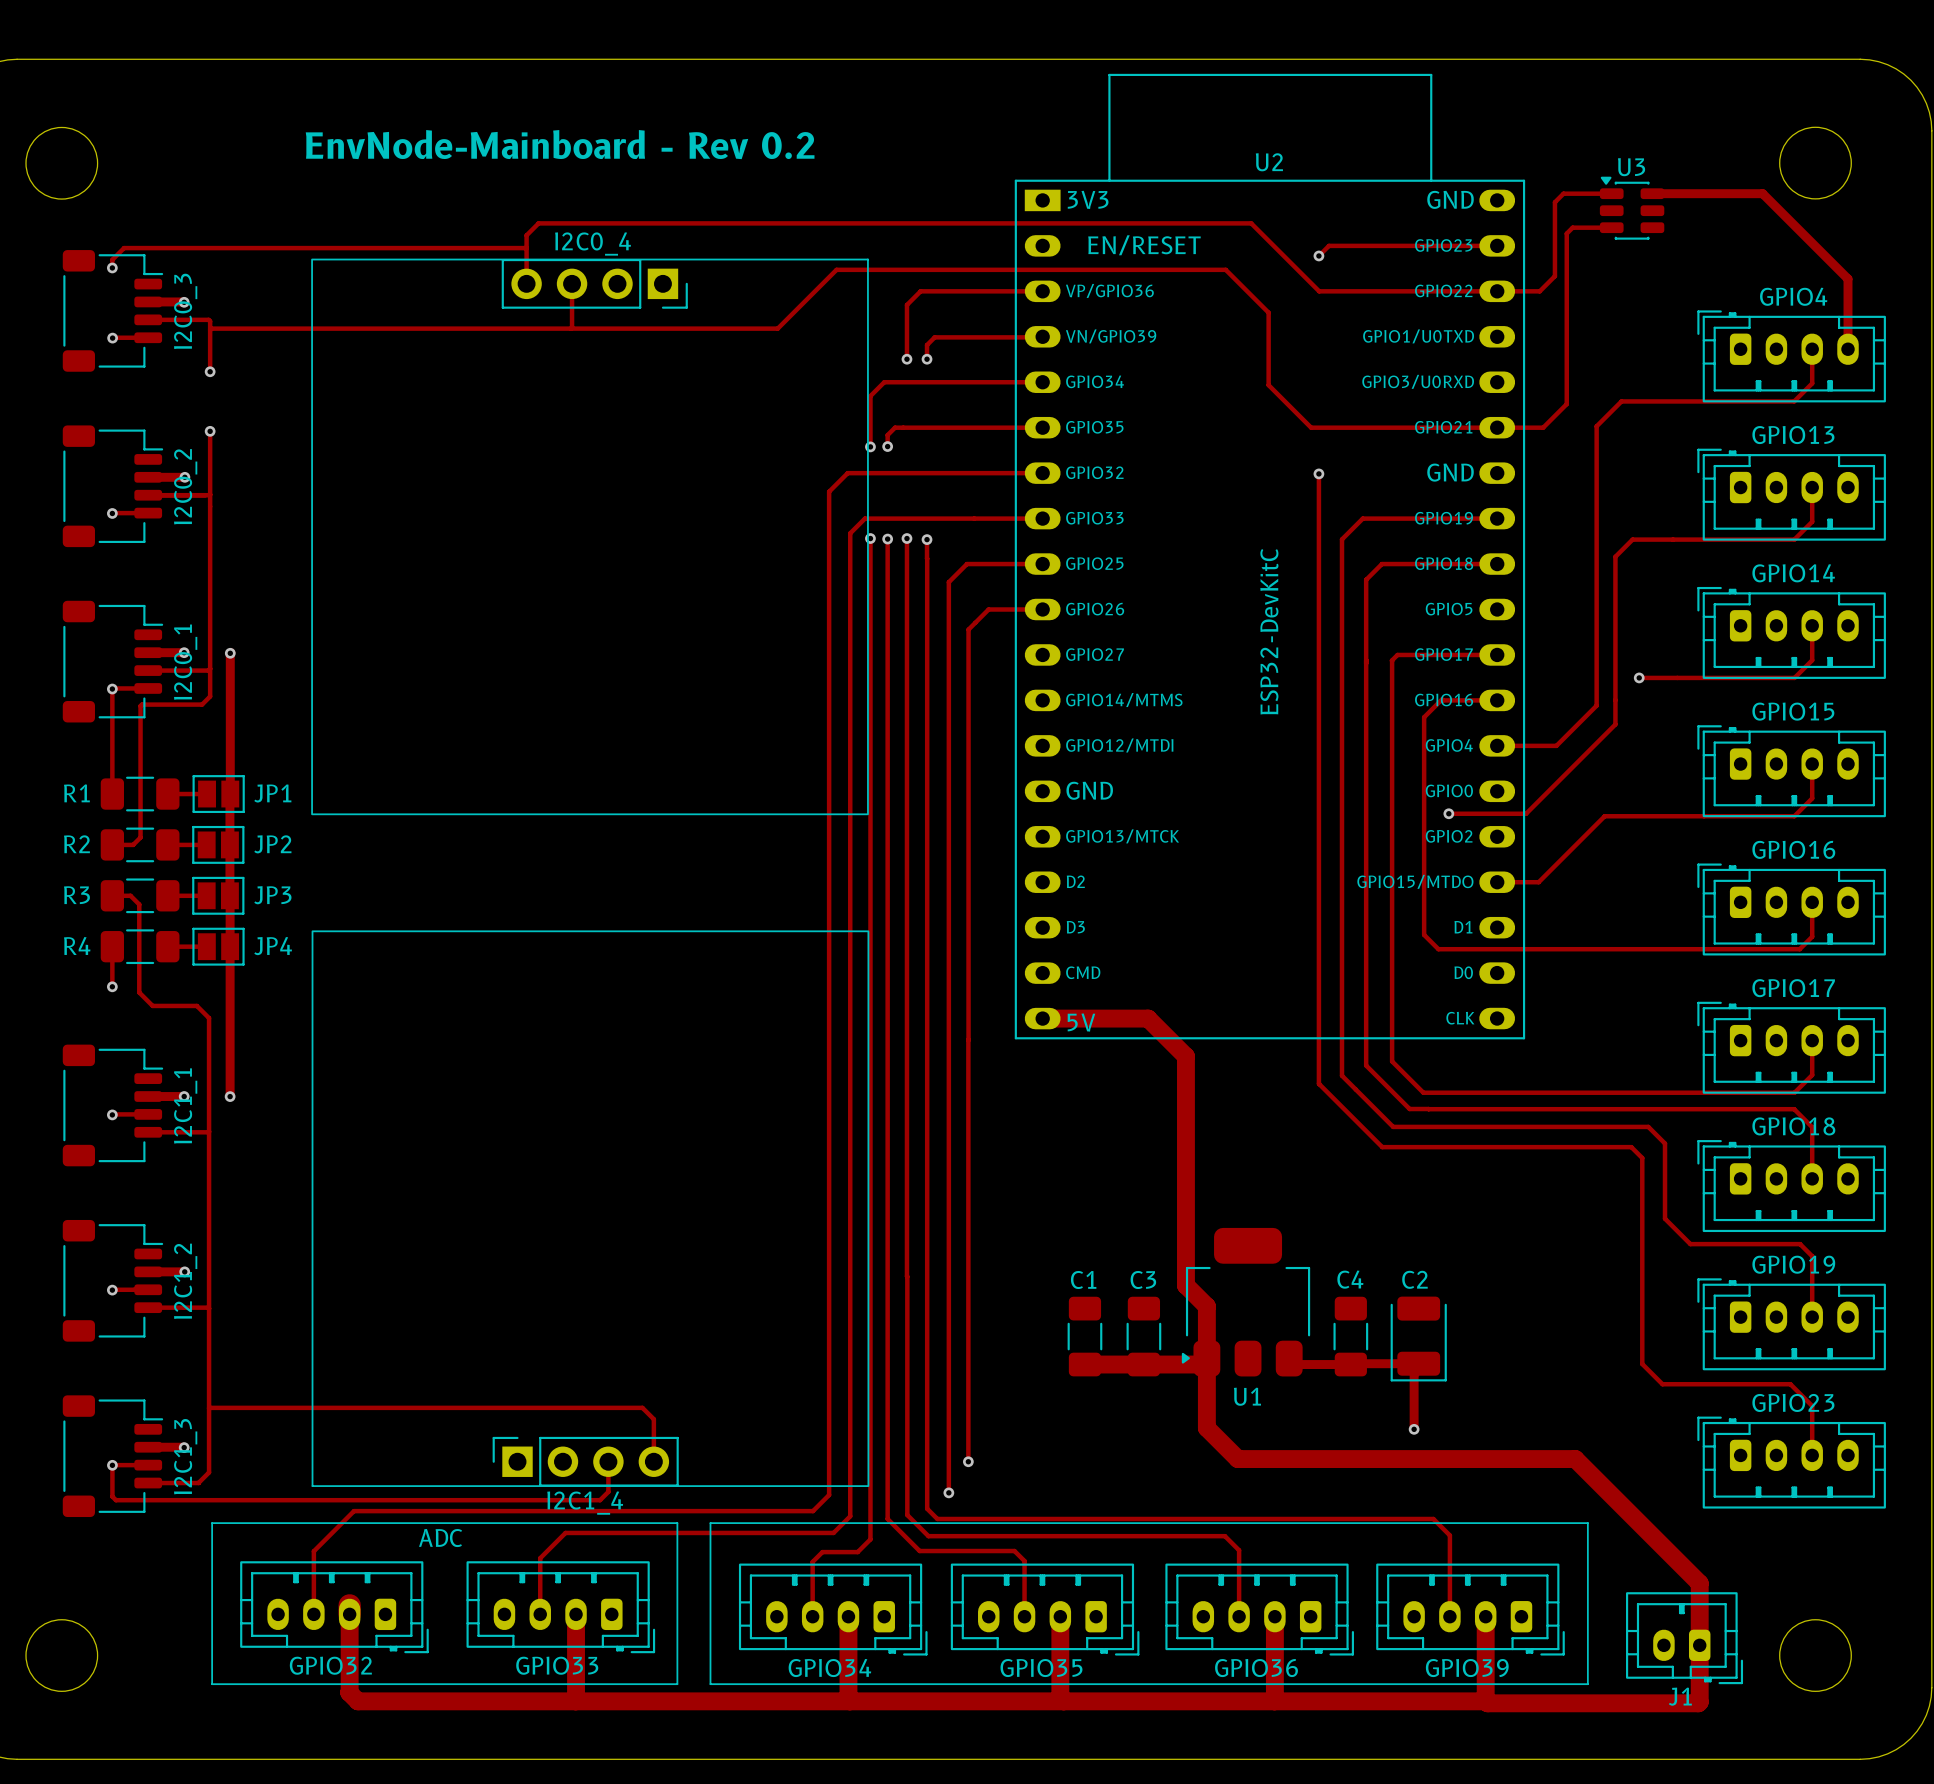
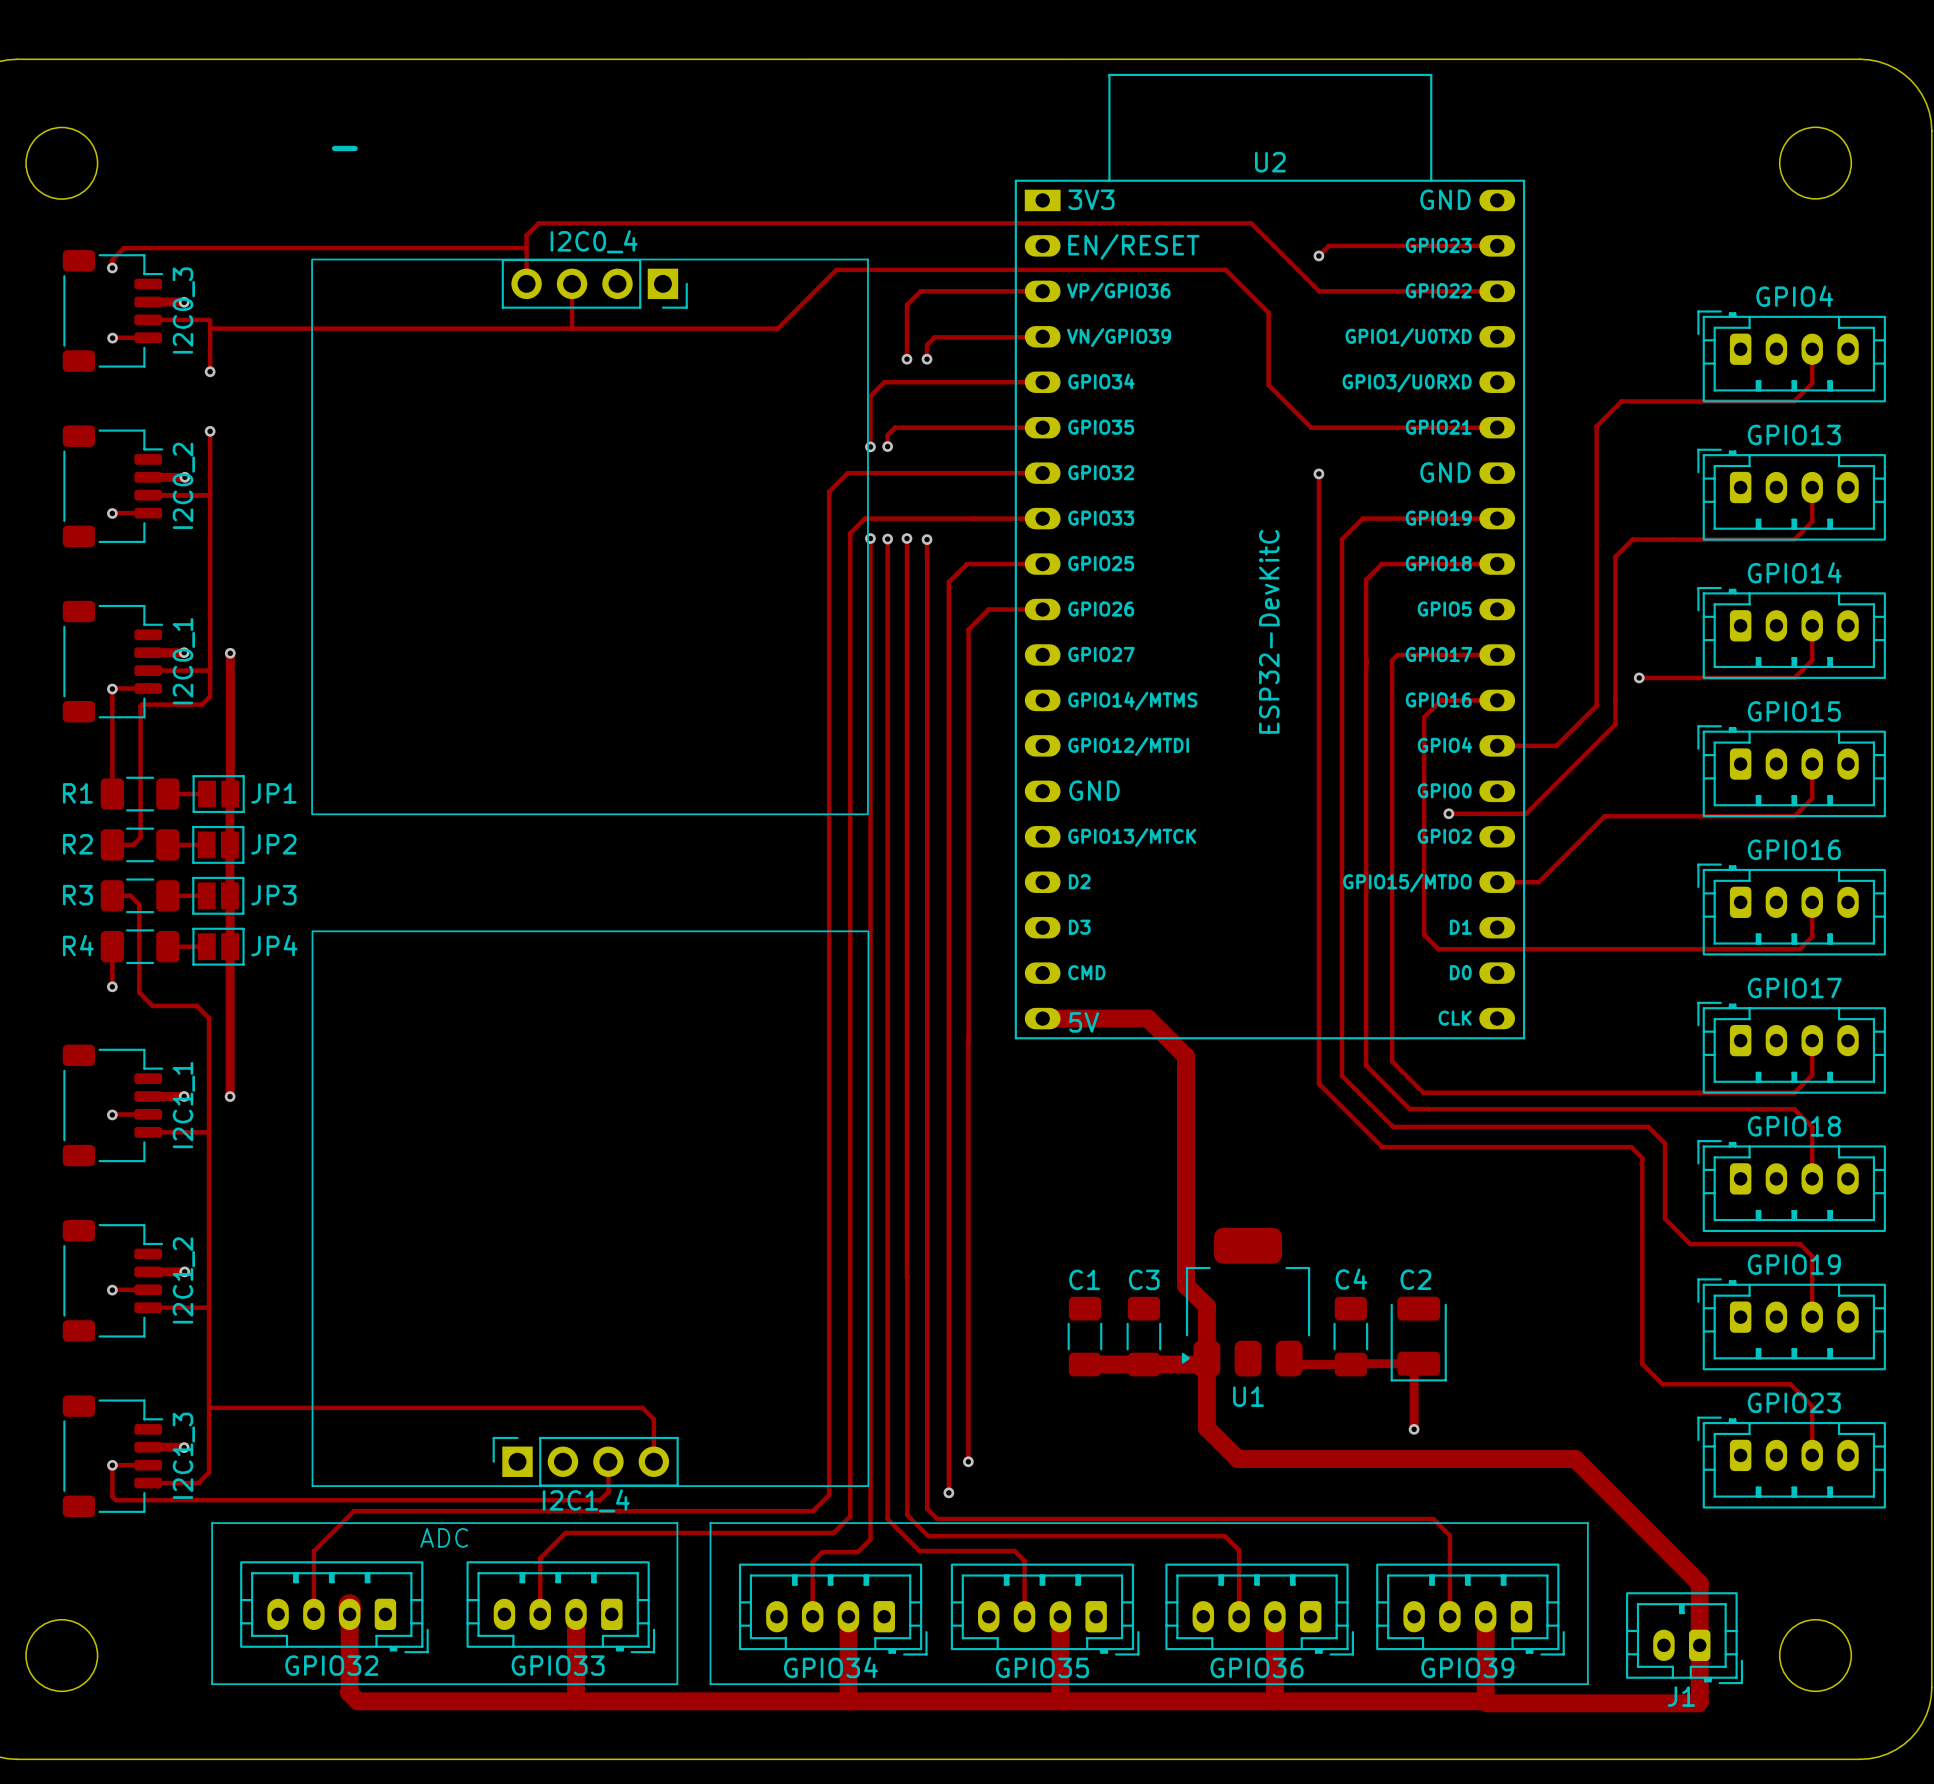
text: EnvNode-Mainboard - Rev 0.2 (560, 144) -> - (344, 148)
track: (1611, 193) (1563, 193) (1554, 202) (1554, 276) (1539, 291) (1497, 291) -> none
track: (1652, 193) (1762, 193) (1848, 278) (1848, 349) -> none
U3: (1632, 208) -> none
track: (1611, 227) (1572, 227) (1566, 233) (1566, 404) (1543, 427) (1497, 427) -> none

